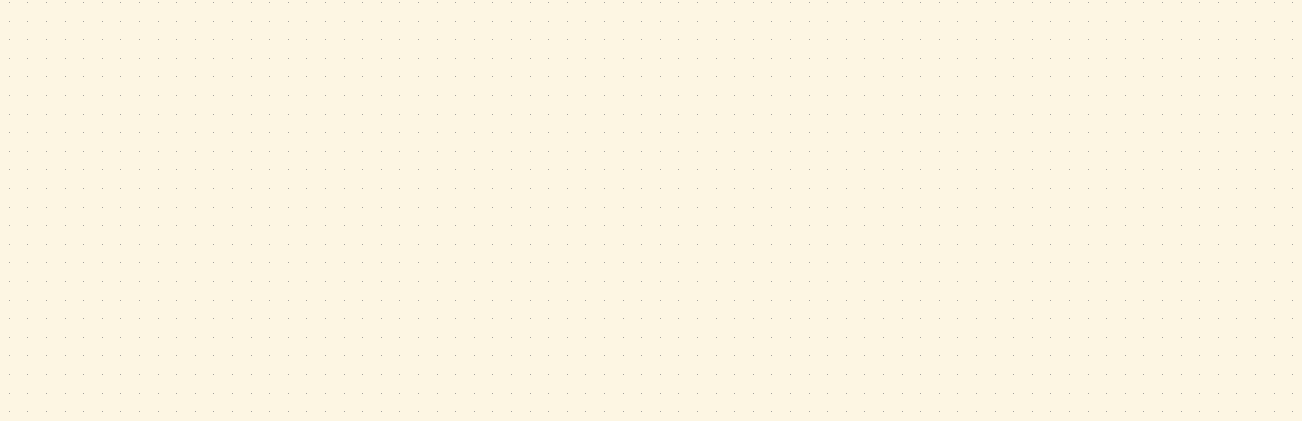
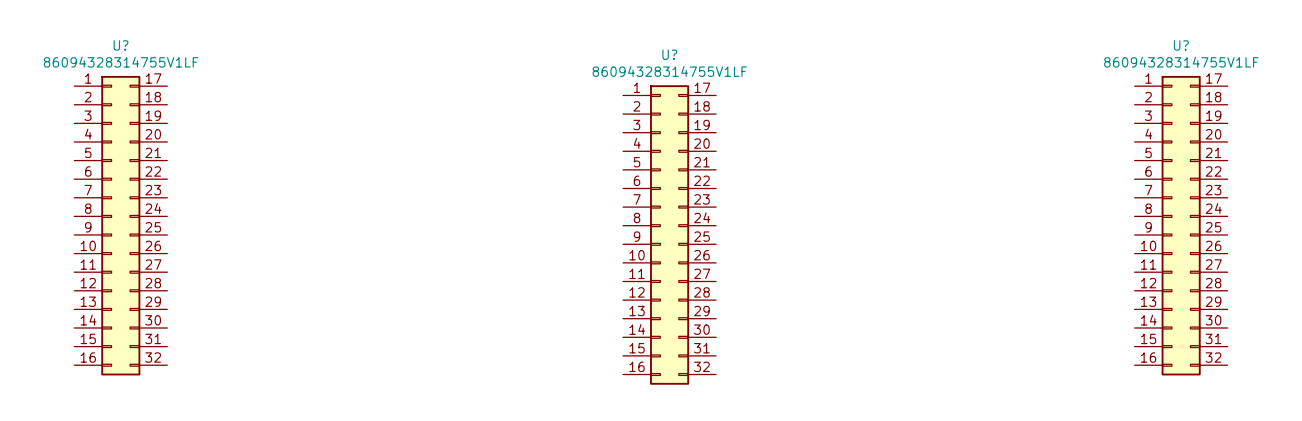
U?: none -> 86094328314755V1LF (120, 225)
U?: none -> 86094328314755V1LF (1181, 225)
U?: none -> 86094328314755V1LF (669, 234)

